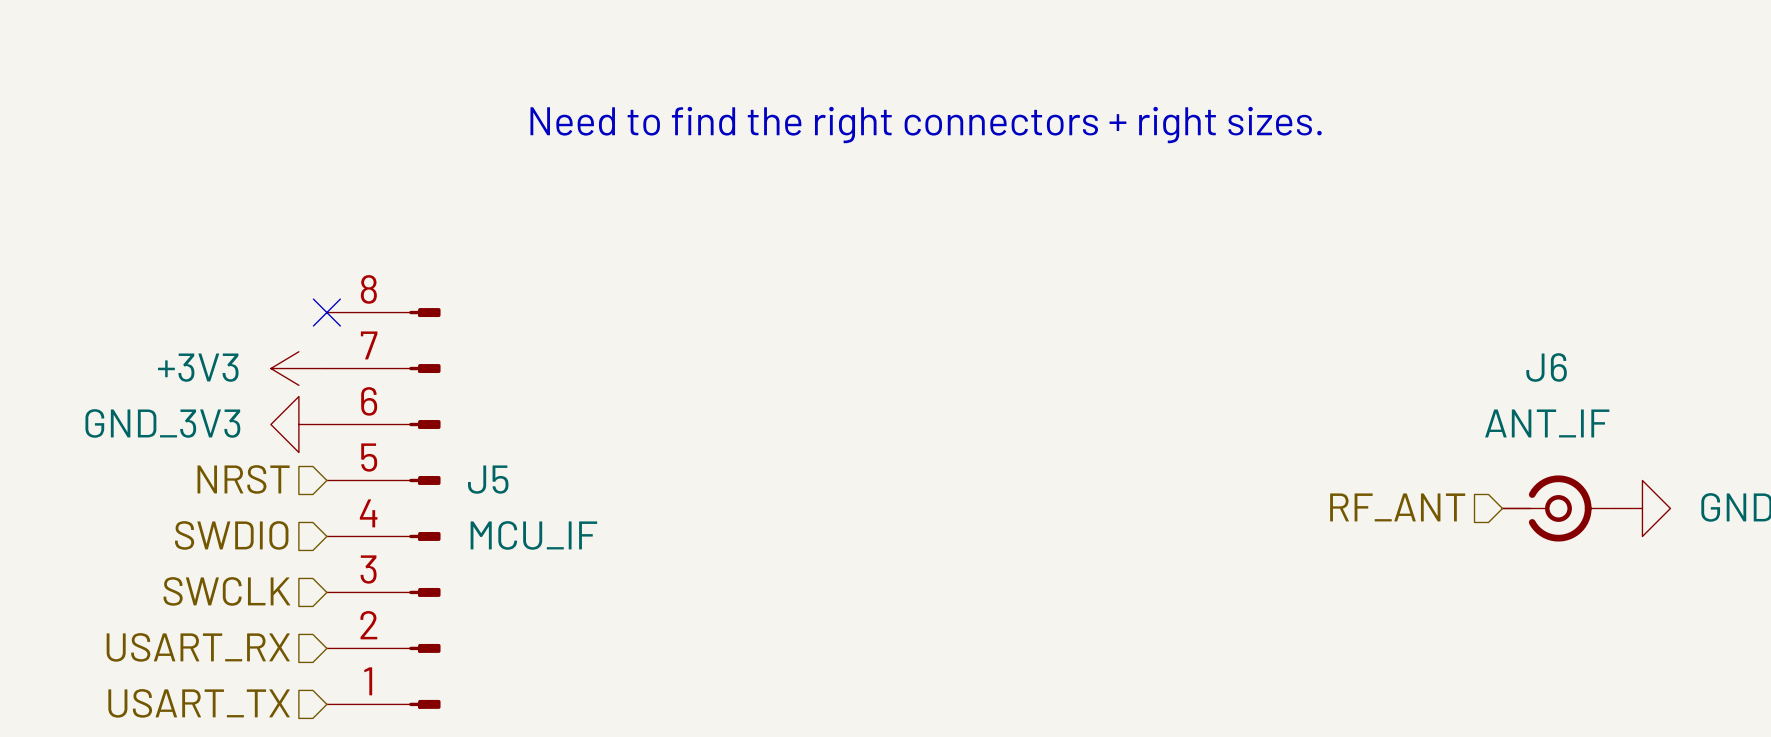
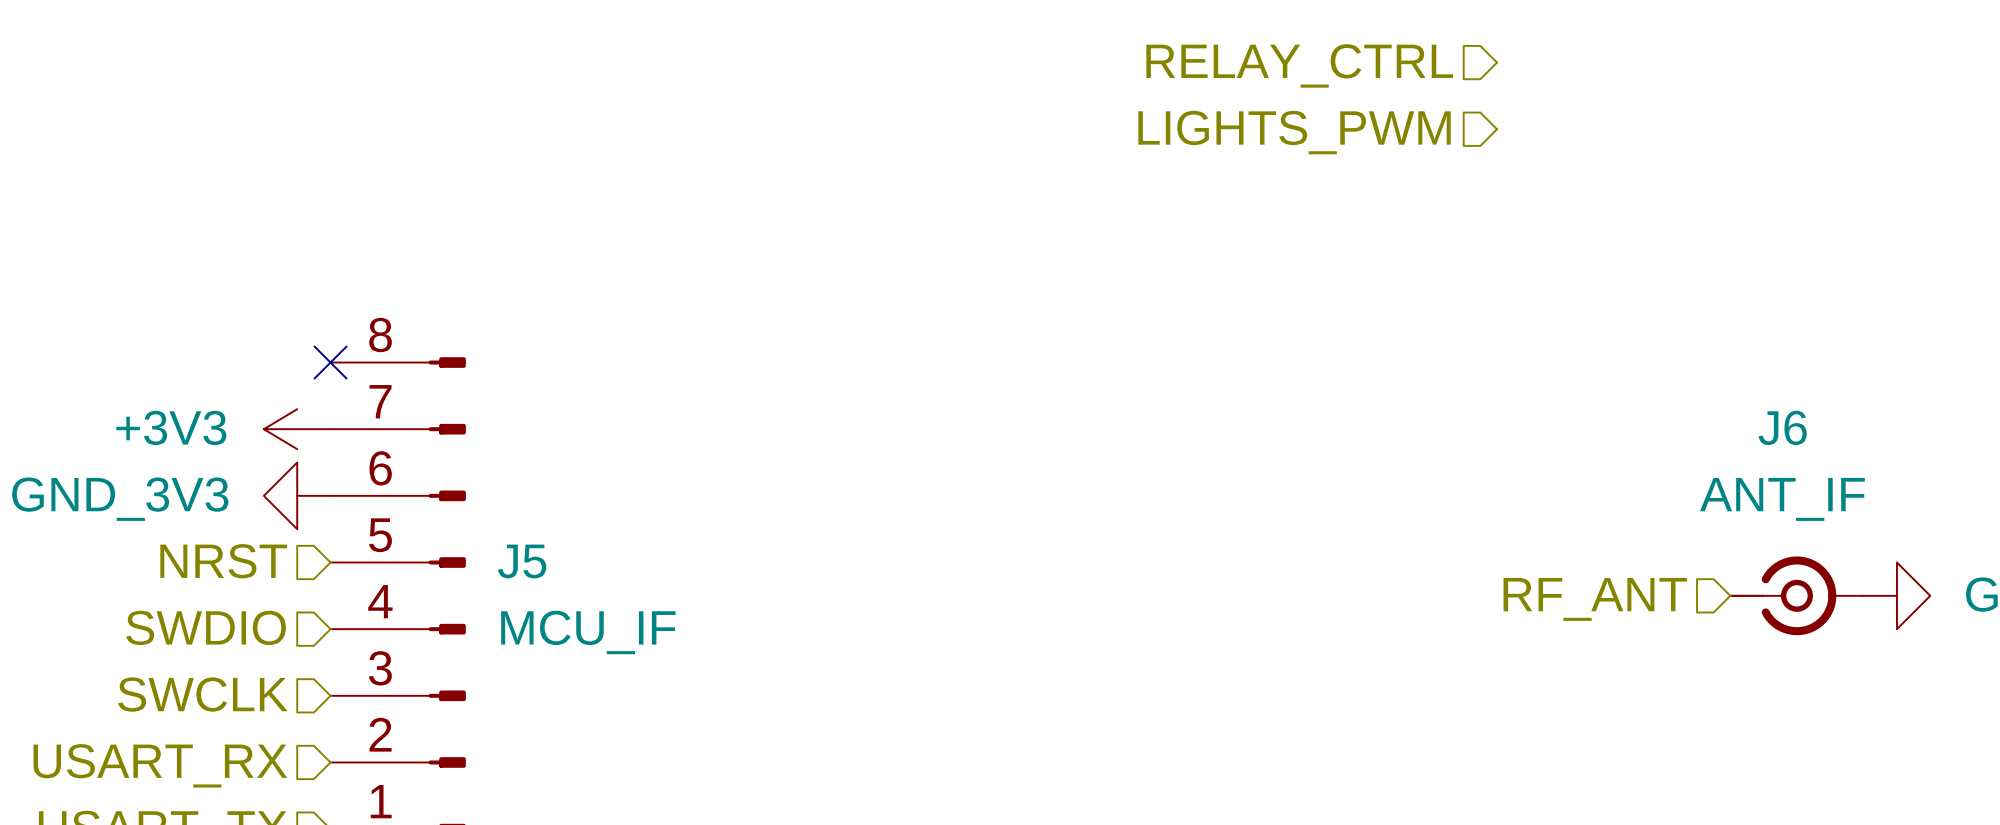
hierarchical label: none -> RELAY_CTRL (1299, 65)
hierarchical label: none -> LIGHTS_PWM (1294, 132)
text: Need to find the right connectors + right sizes. (926, 125) -> none

